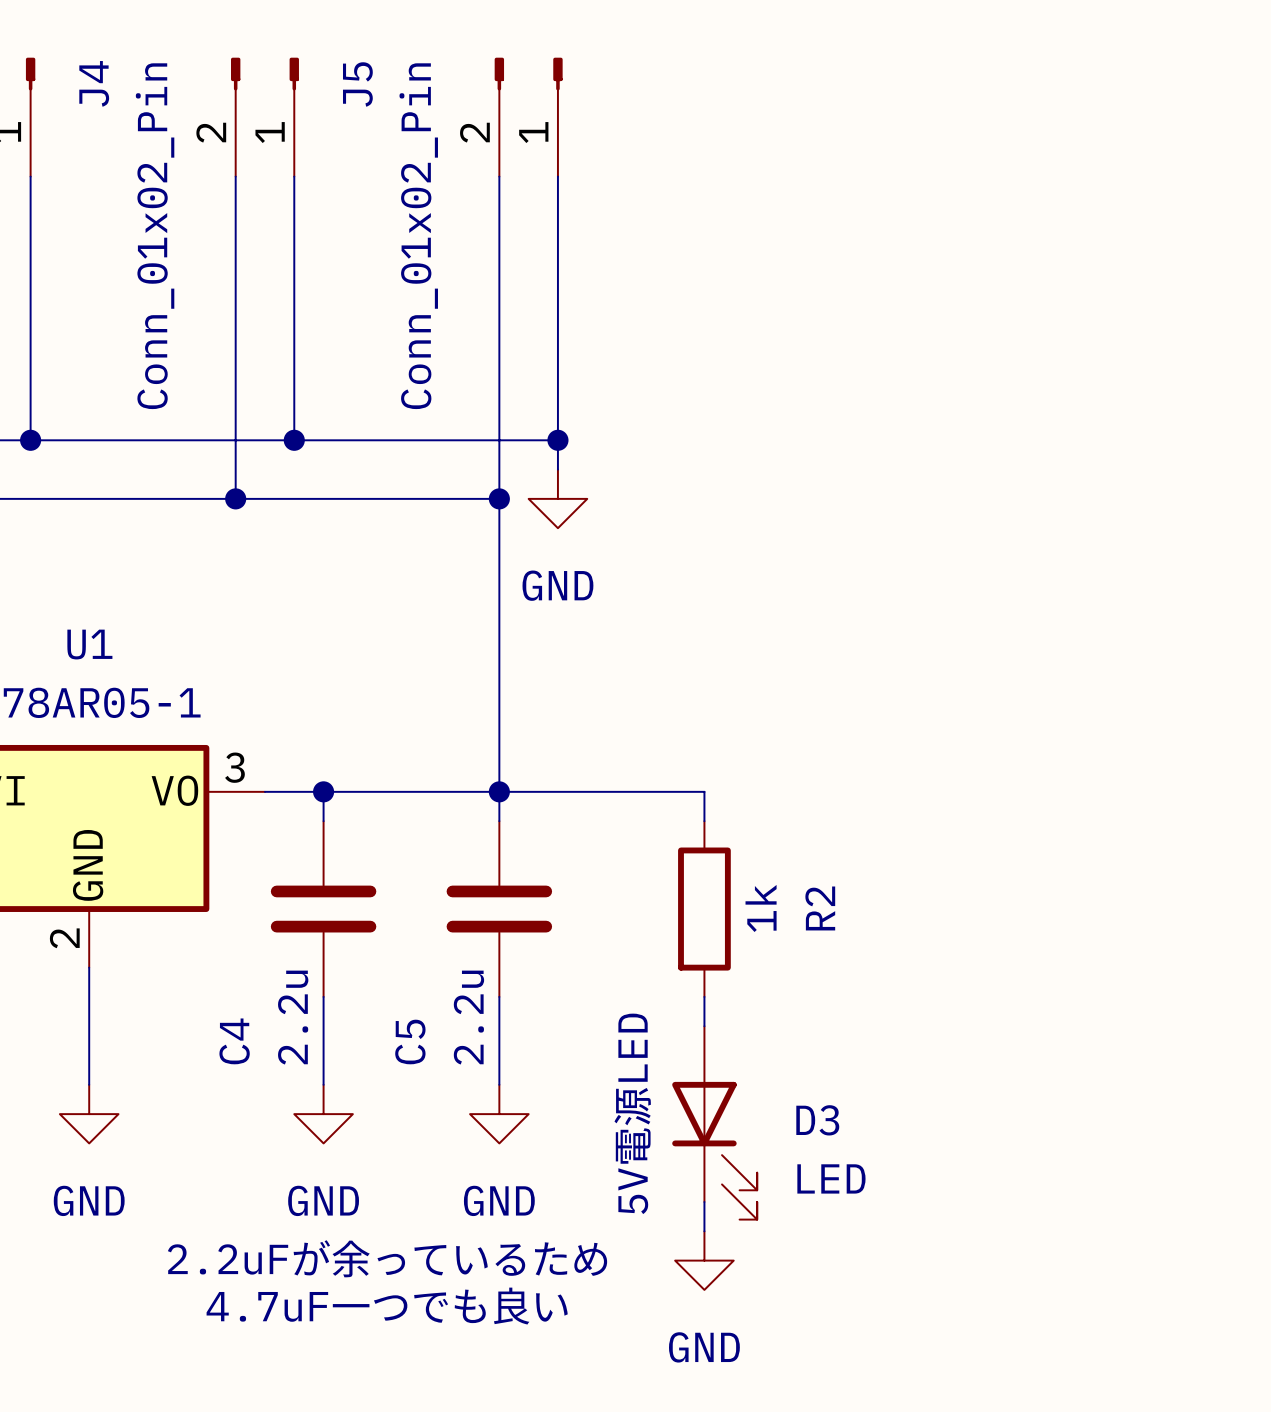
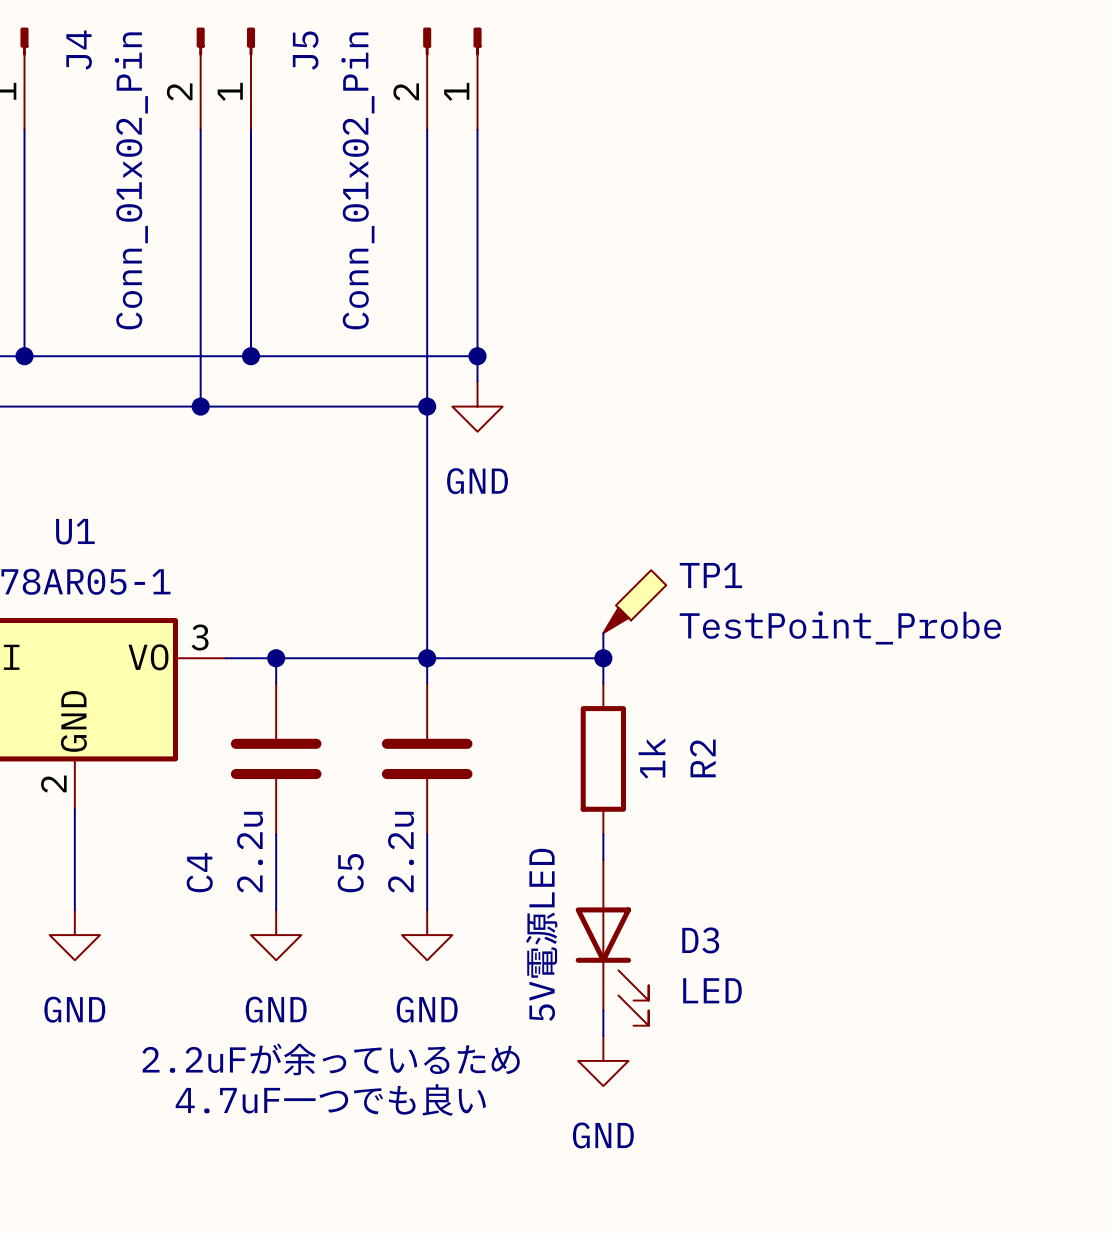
TP1: none -> TestPoint_Probe (634, 601)
wire: none -> (603, 633) (603, 658)
junction: none -> (603, 658)

